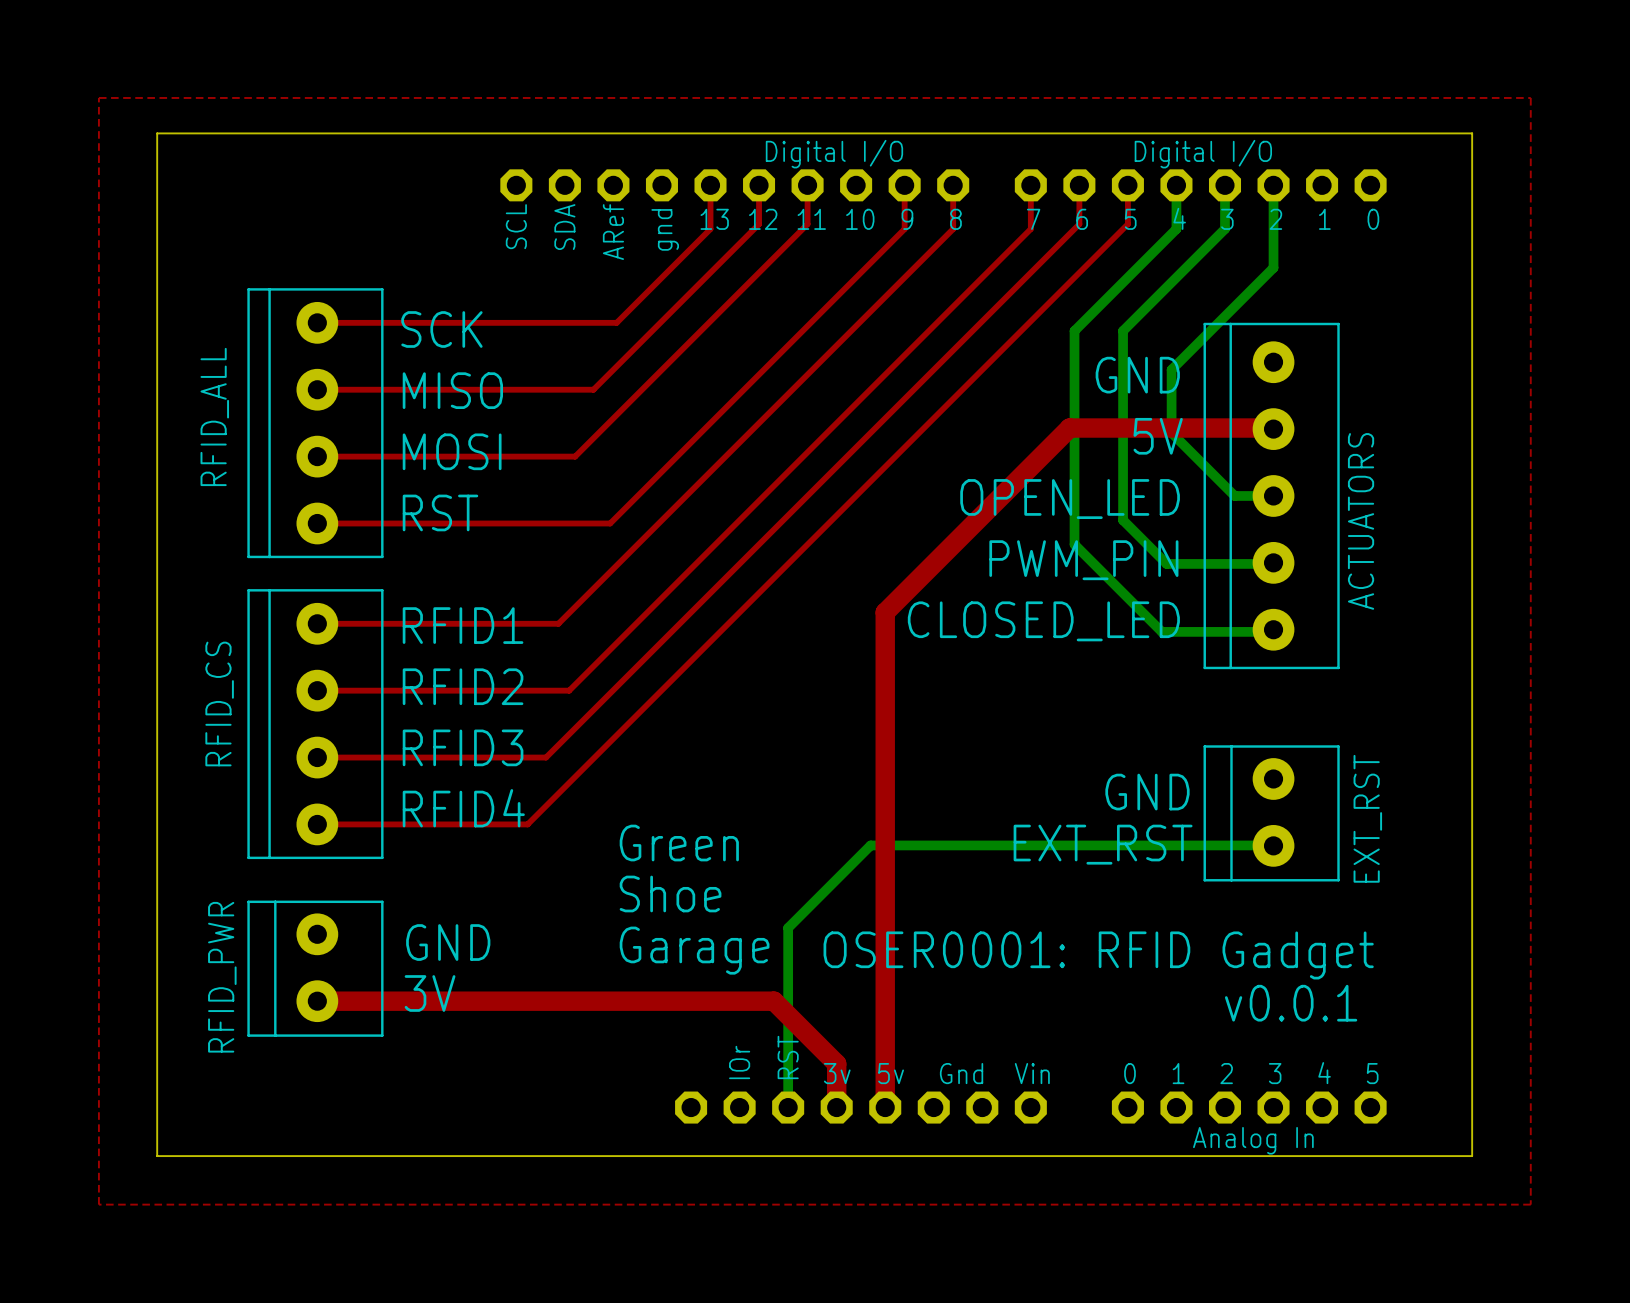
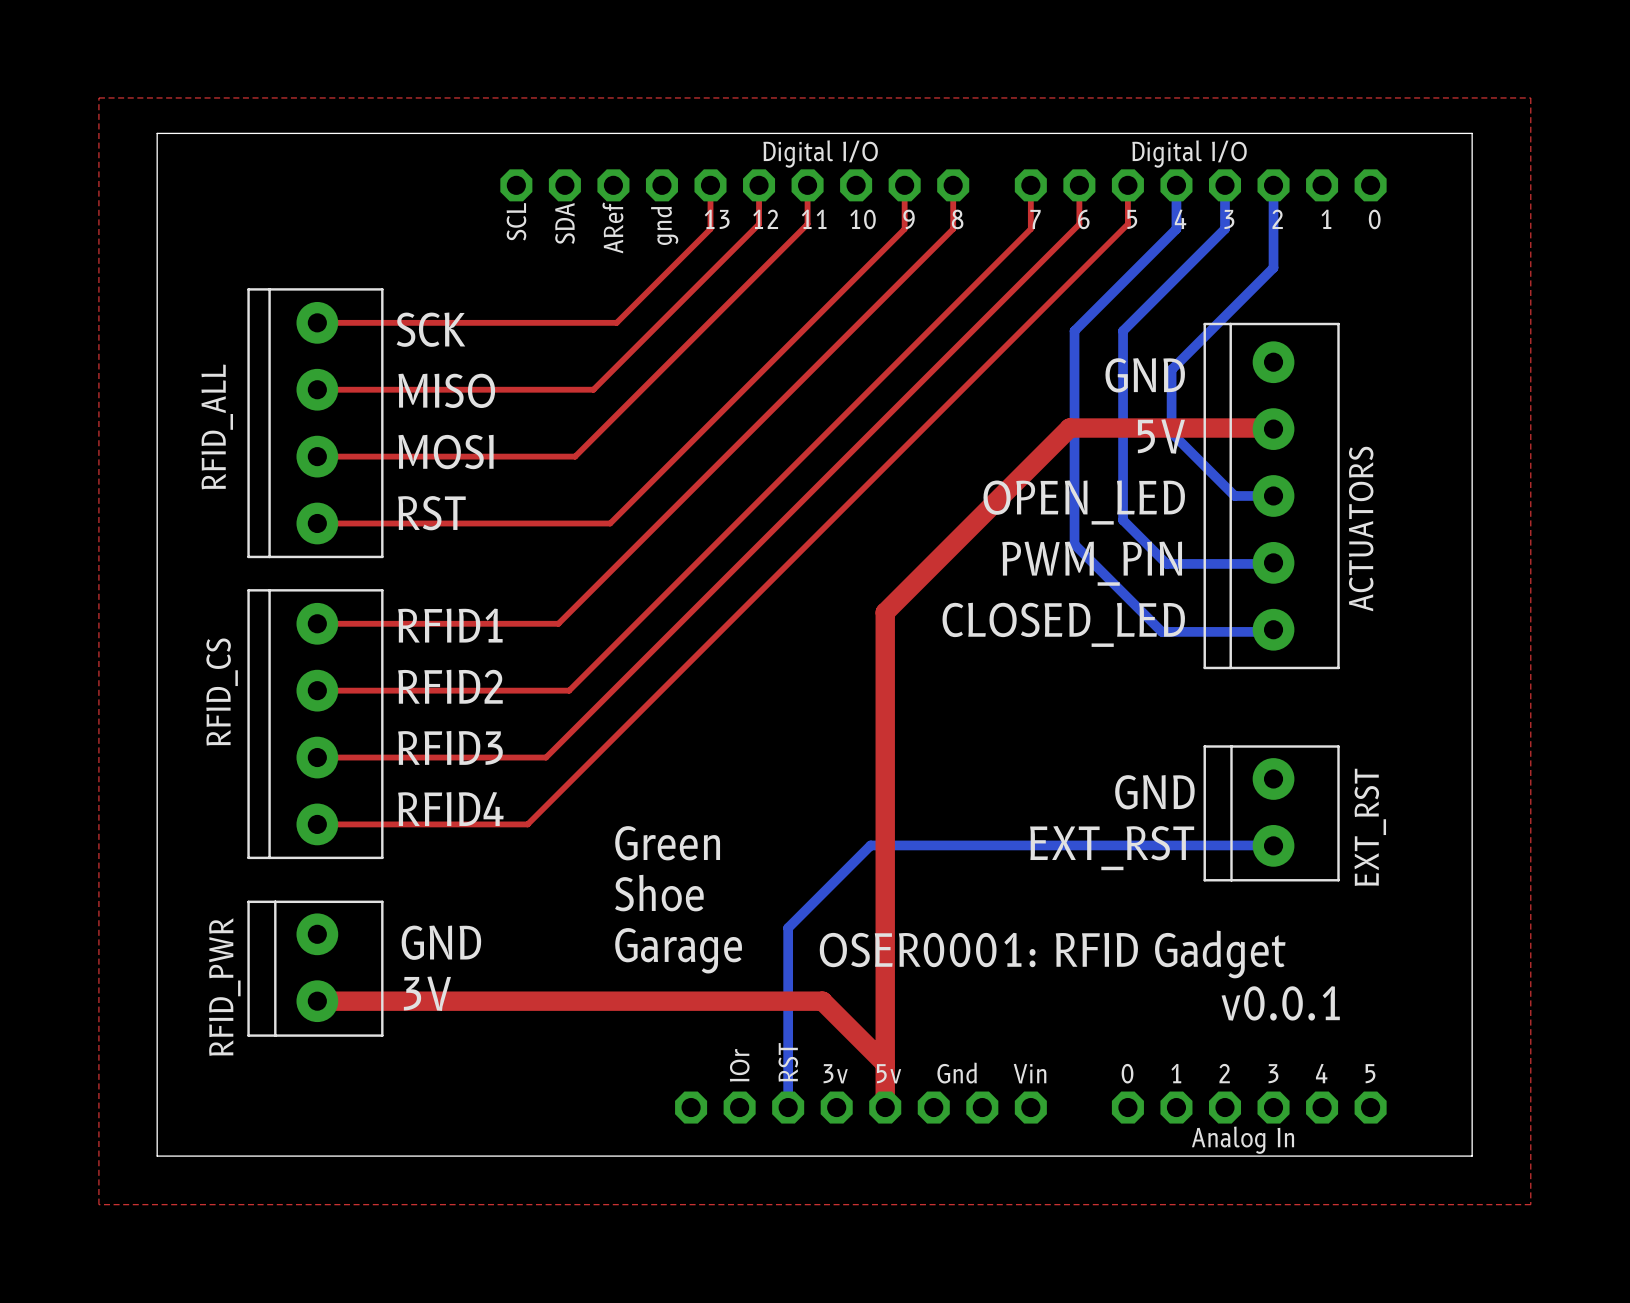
top track: (774, 1001) (836, 1063) (836, 1107) -> (774, 1001) (822, 1001) (885, 1063)

